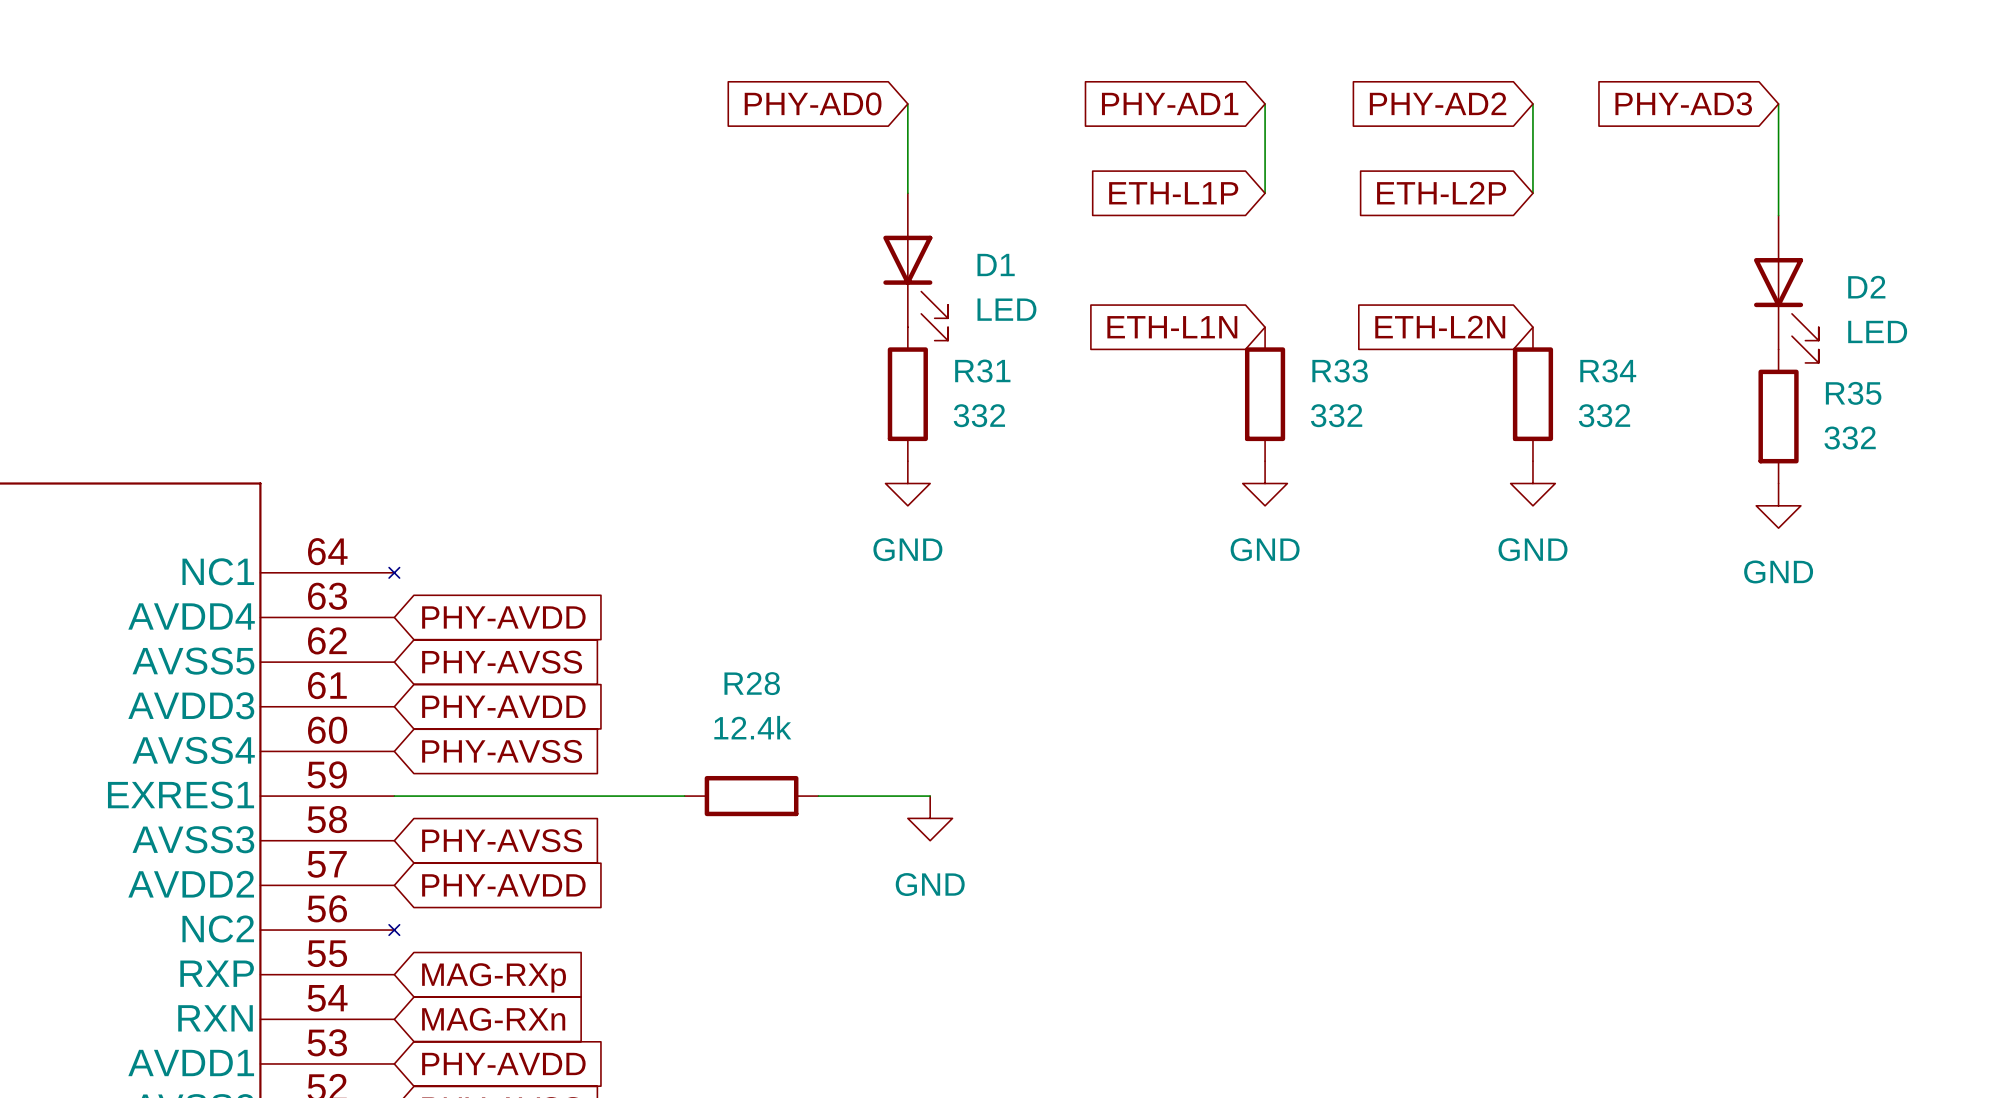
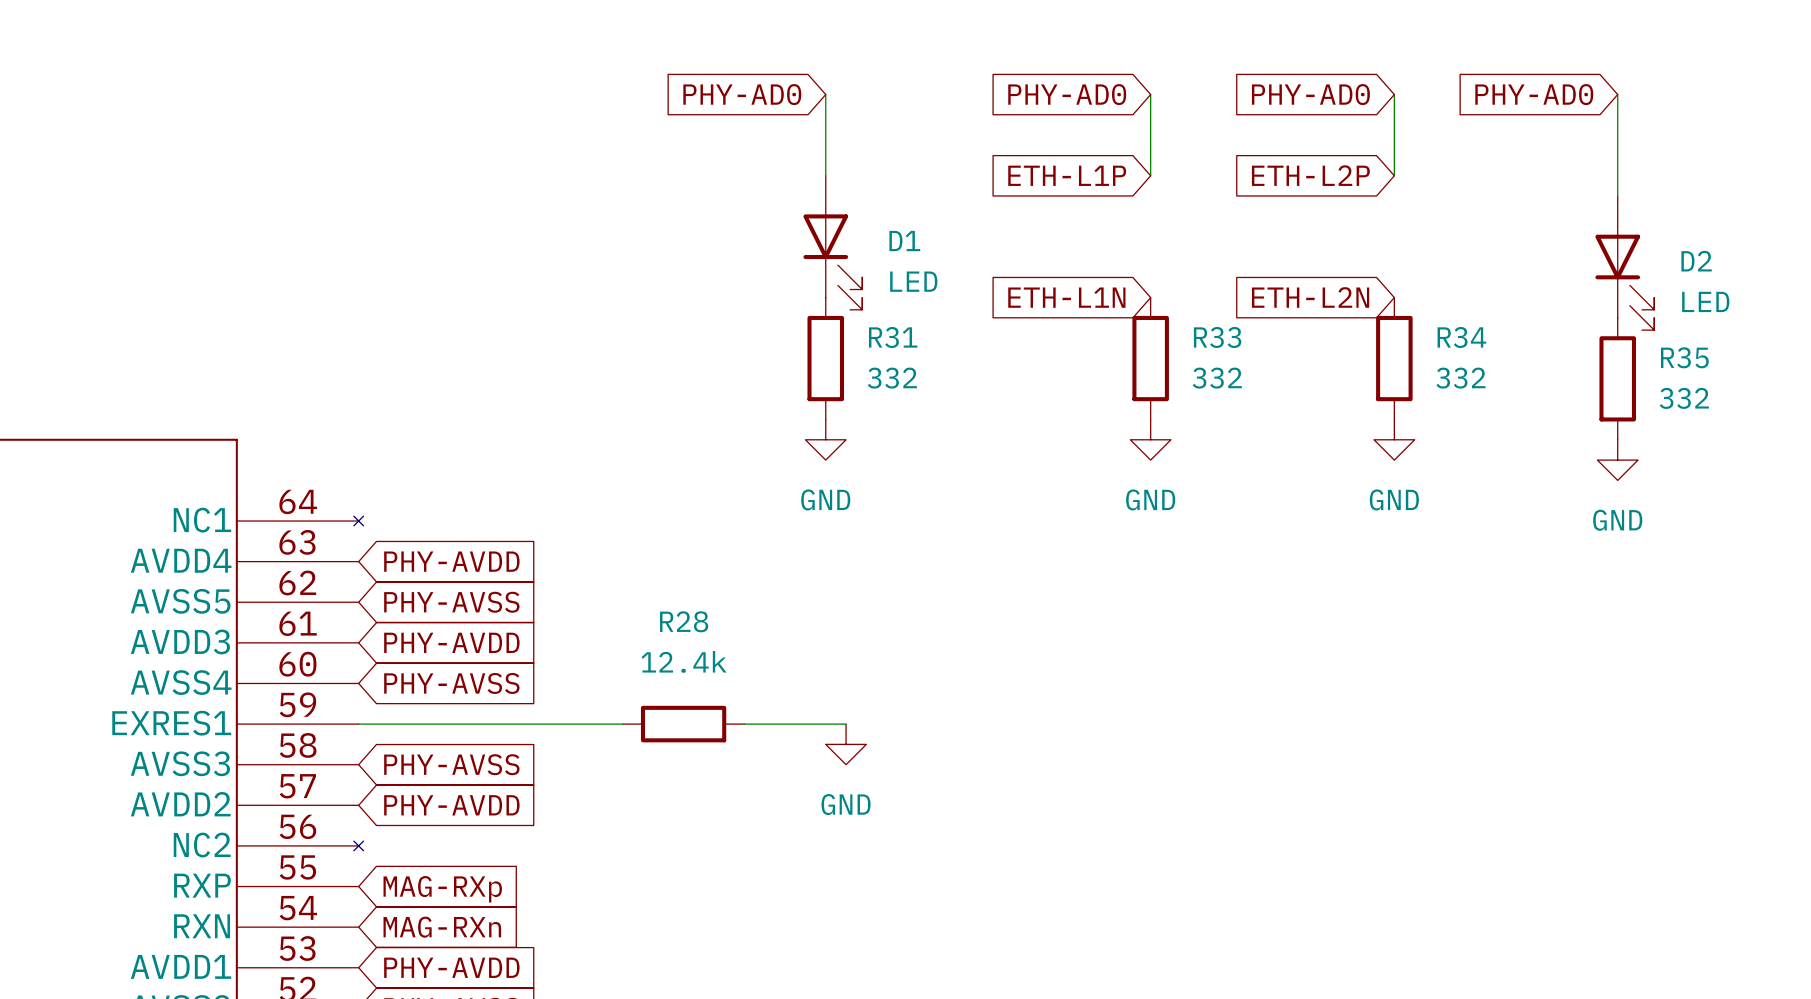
global label: PHY-AD1 (1170, 103) -> PHY-AD0 (1067, 94)
global label: PHY-AD2 (1438, 103) -> PHY-AD0 (1310, 94)
global label: PHY-AD3 (1683, 103) -> PHY-AD0 (1534, 94)

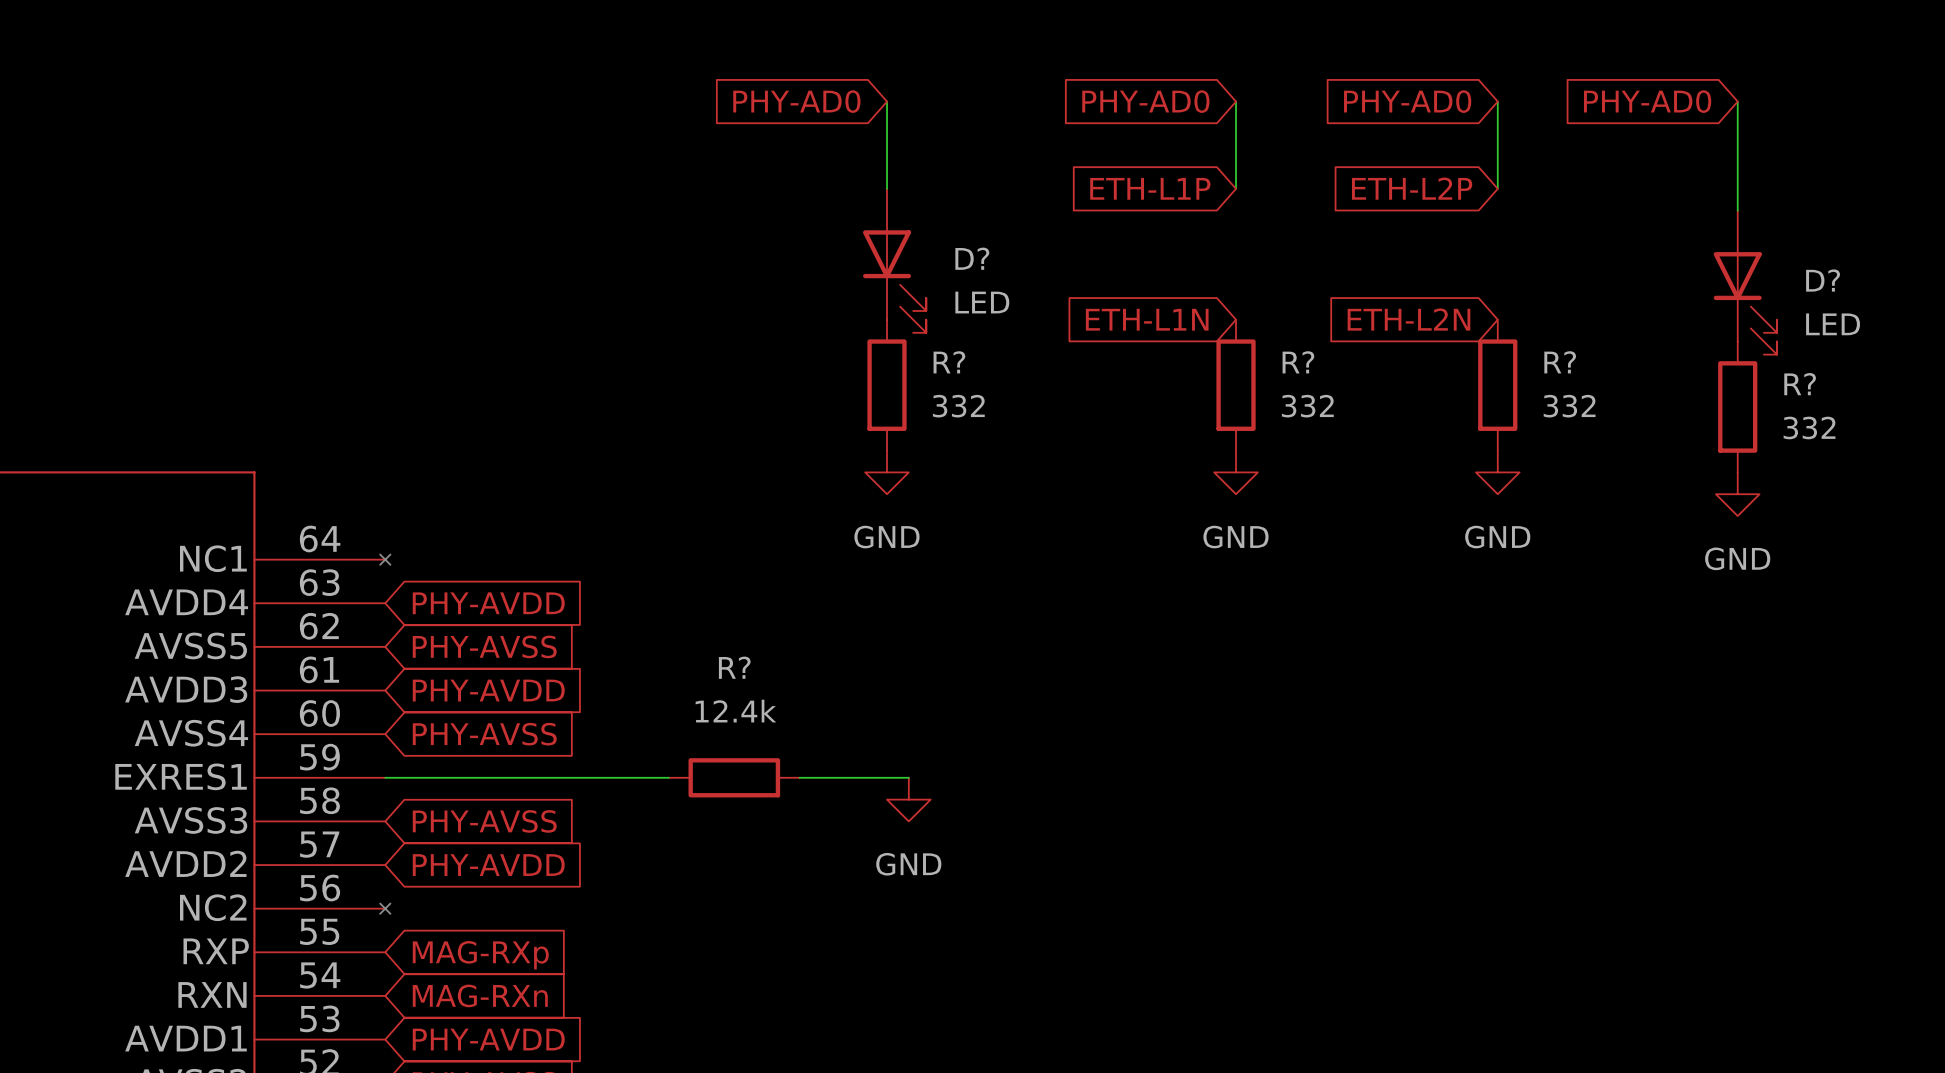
D1 name: D1 (904, 241) -> D? (972, 258)
D2 name: D2 (1696, 261) -> D? (1823, 280)
R31 name: R31 (893, 337) -> R? (949, 362)
R33 name: R33 (1217, 337) -> R? (1298, 362)
R34 name: R34 (1461, 337) -> R? (1560, 362)
R35 name: R35 (1684, 357) -> R? (1800, 384)
R28 name: R28 (684, 621) -> R? (734, 667)

